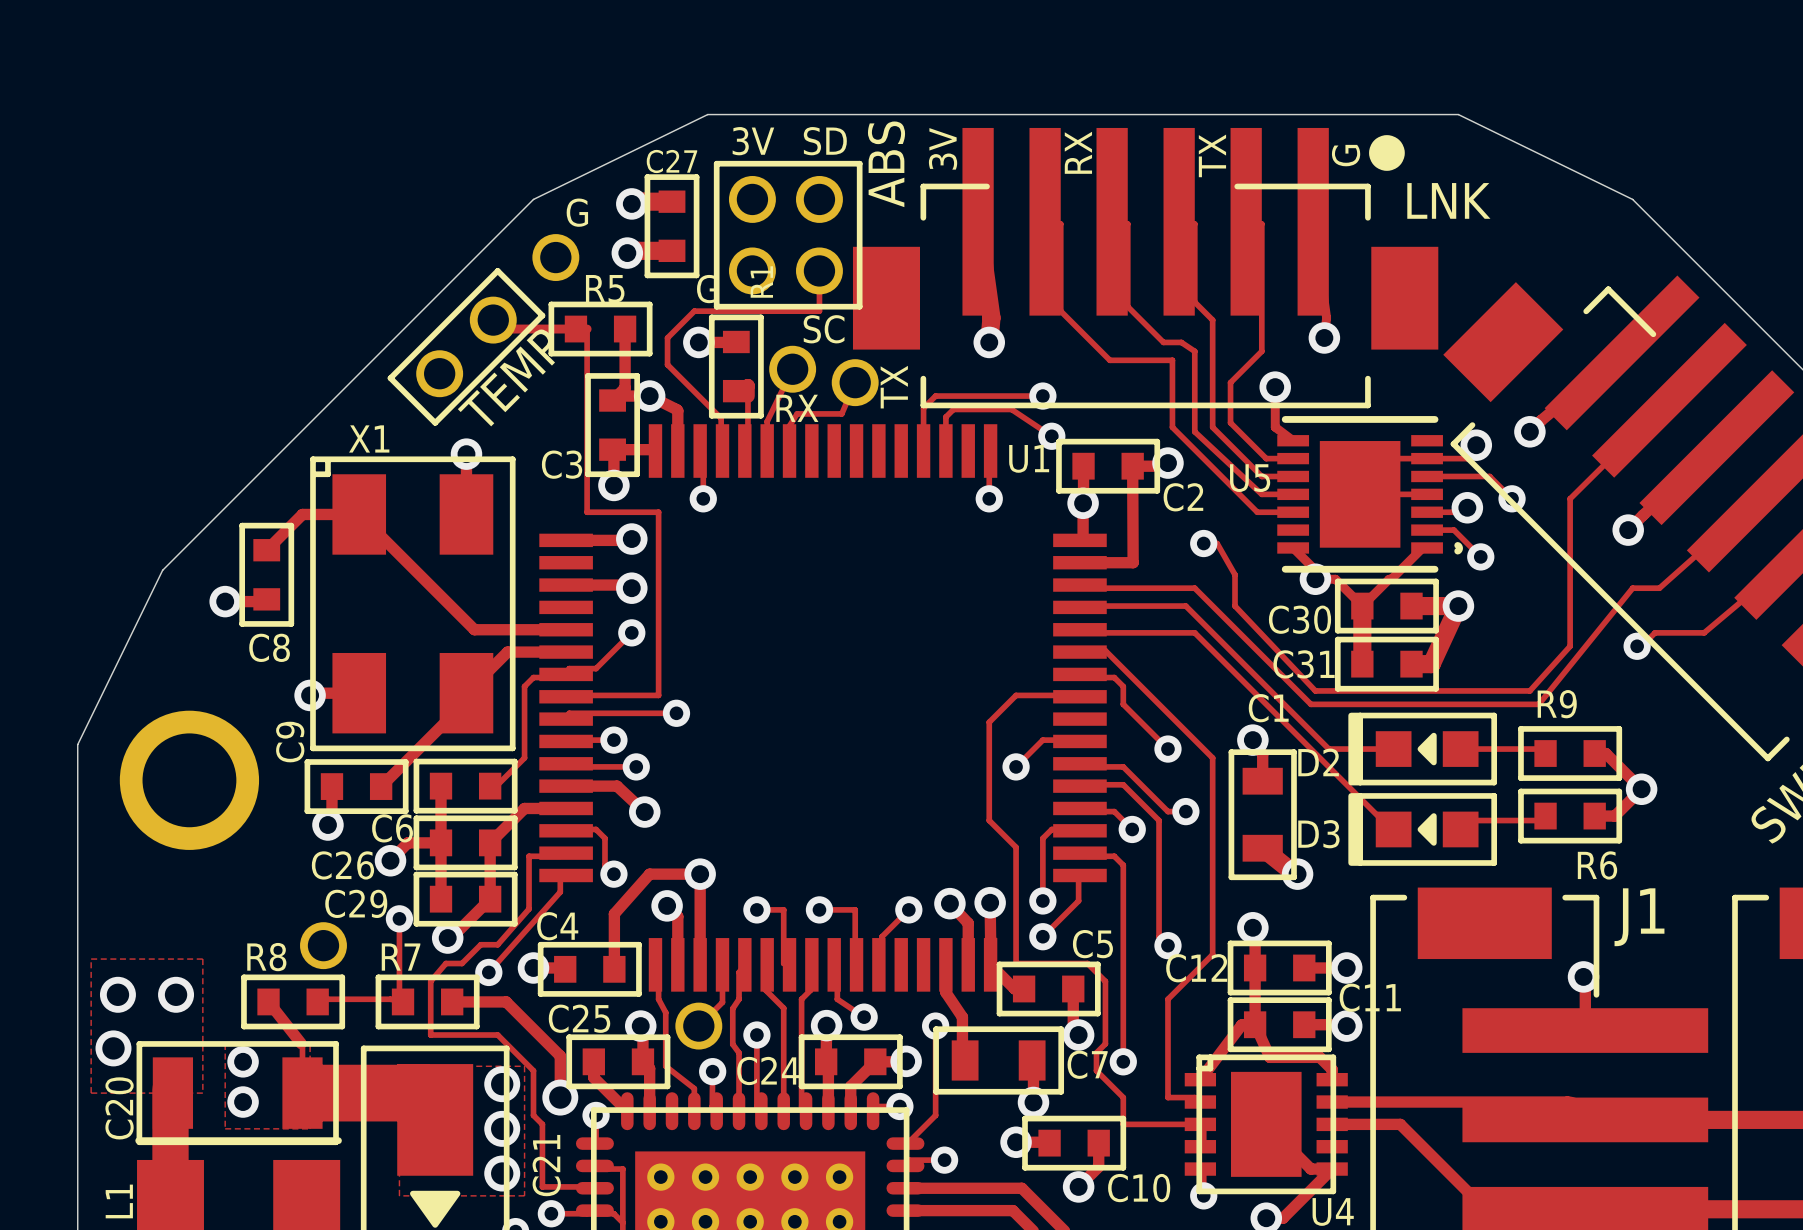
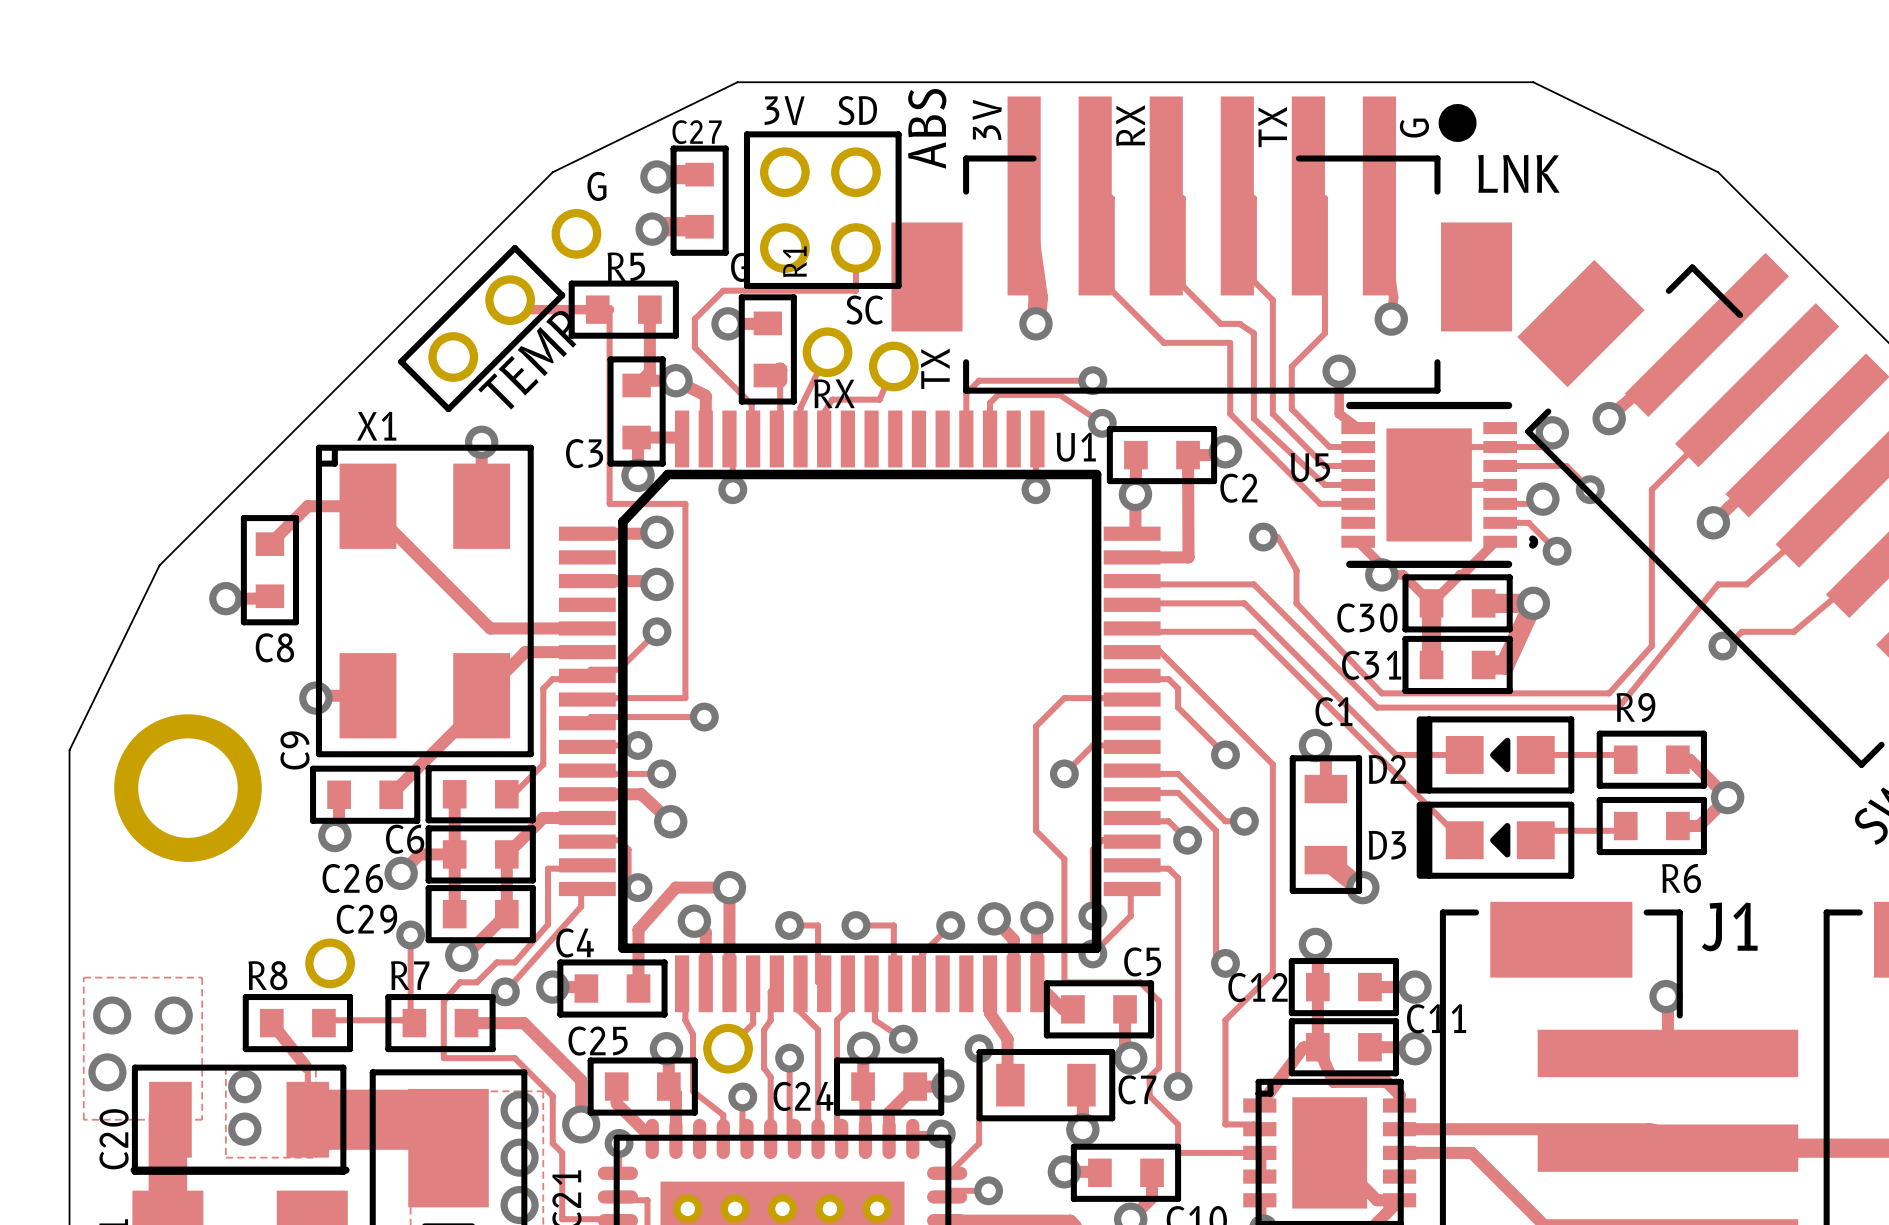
U1 footprint: [539, 424, 1107, 992] -> [558, 410, 1161, 1013]

